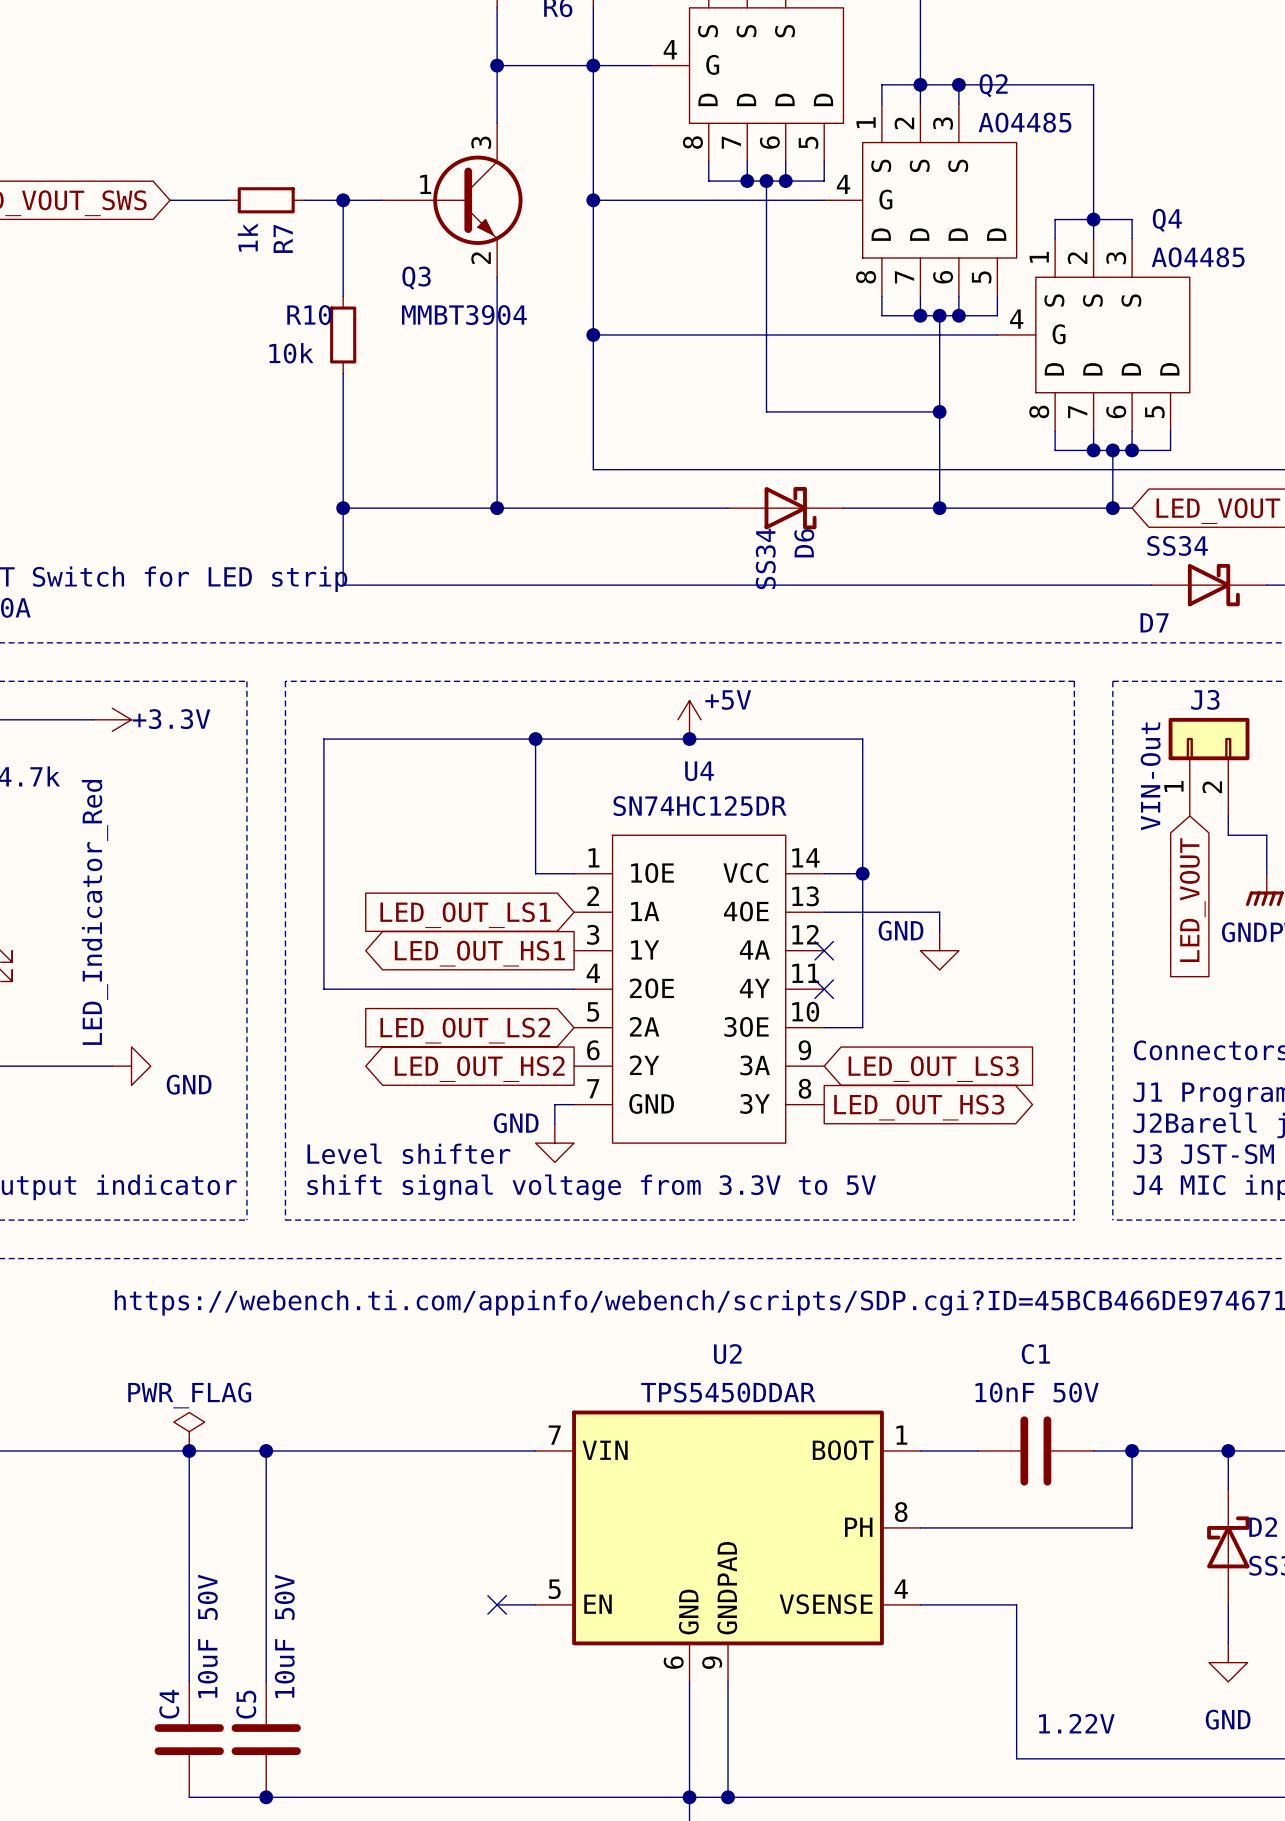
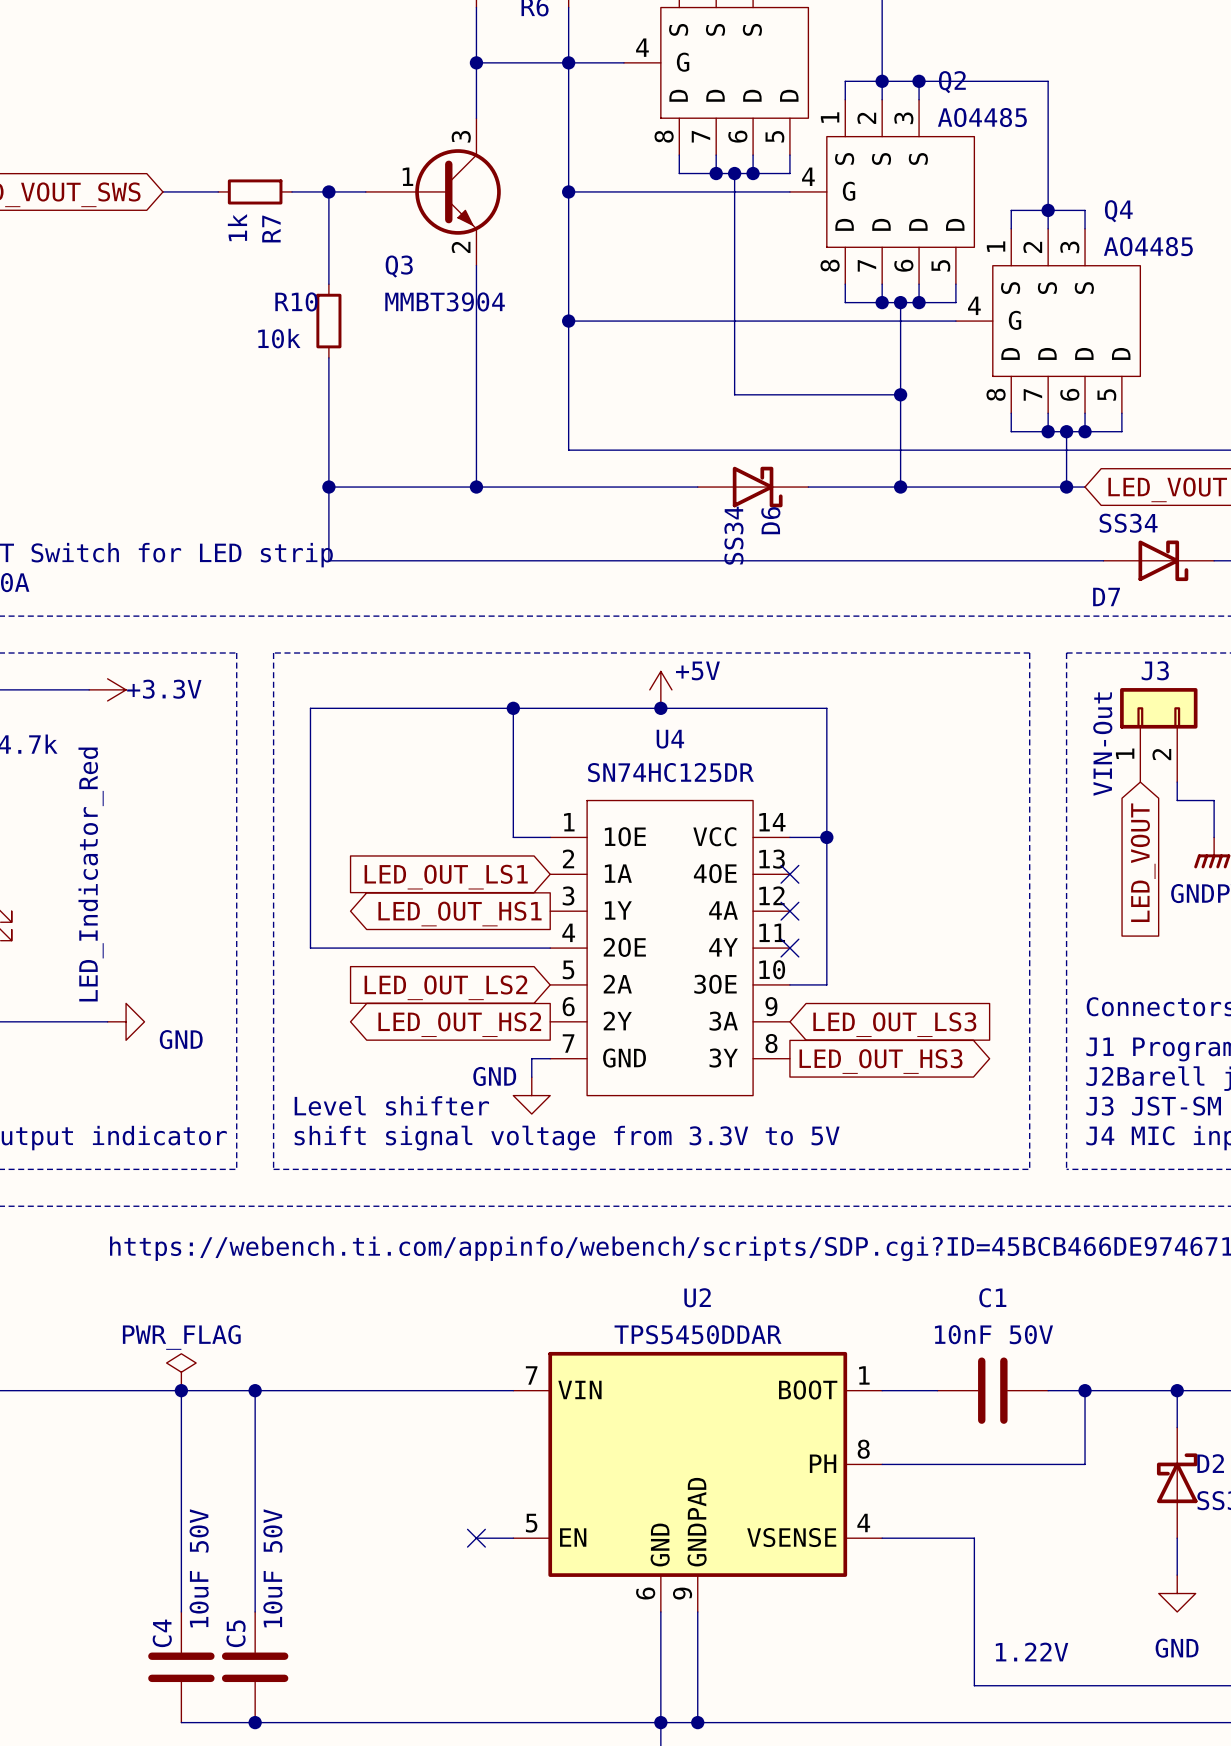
wire: (824, 912) (939, 912) (939, 931) -> none
no-connect mark: none -> (789, 874)
power symbol: GND (939, 950) -> none

